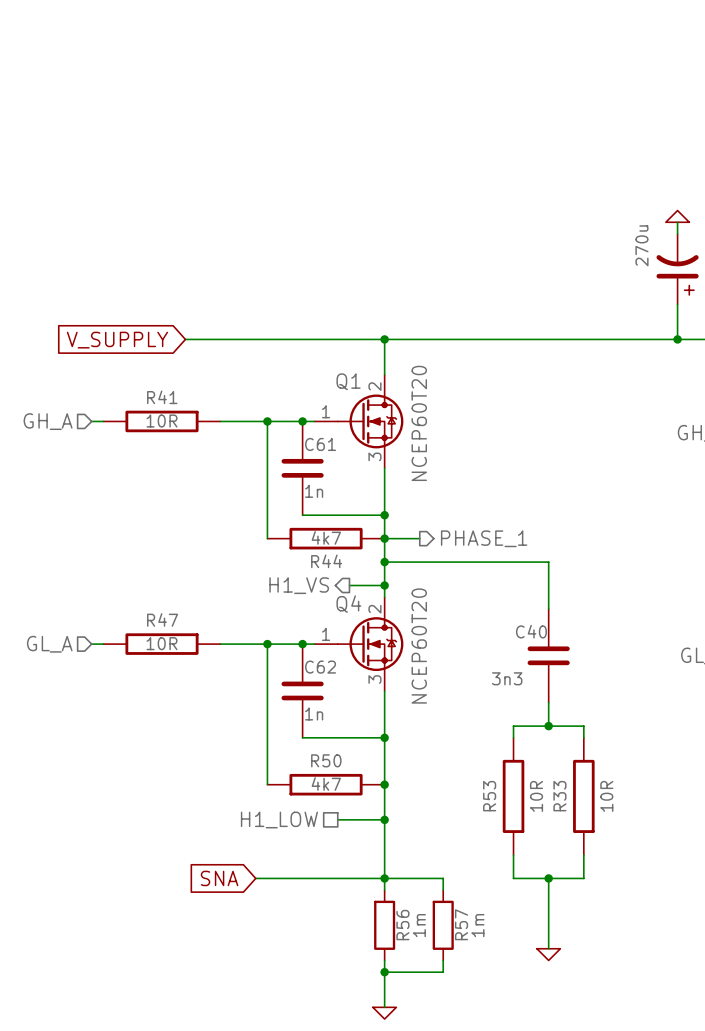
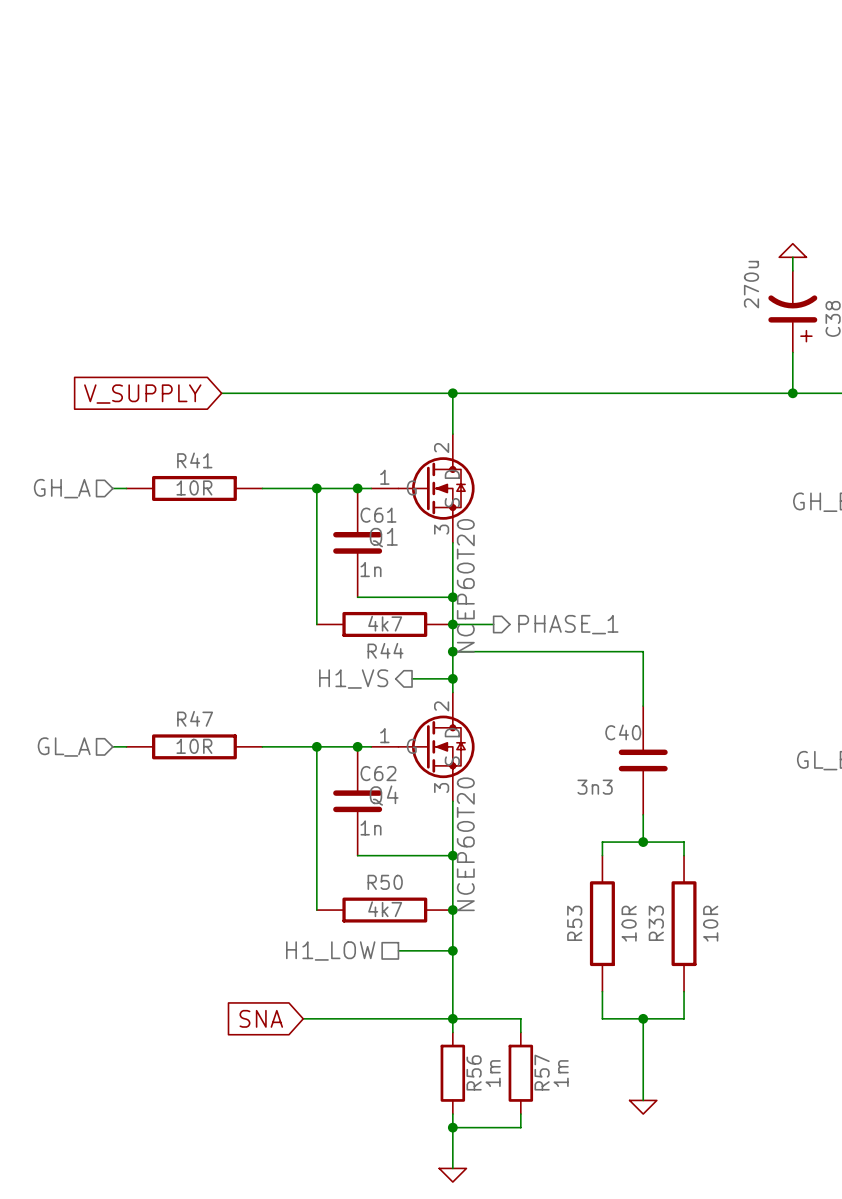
Q1 symbol: [314, 374, 404, 469] -> [371, 434, 475, 543]
Q1 name position: Q1 (348, 381) -> Q1 (383, 537)
Q1 value position: NCEP60T20 (419, 423) -> NCEP60T20 (465, 585)
Q4 symbol: [314, 597, 404, 691] -> [371, 692, 475, 802]
Q4 name position: Q4 (348, 604) -> Q4 (384, 795)
Q4 value position: NCEP60T20 (419, 646) -> NCEP60T20 (465, 844)

